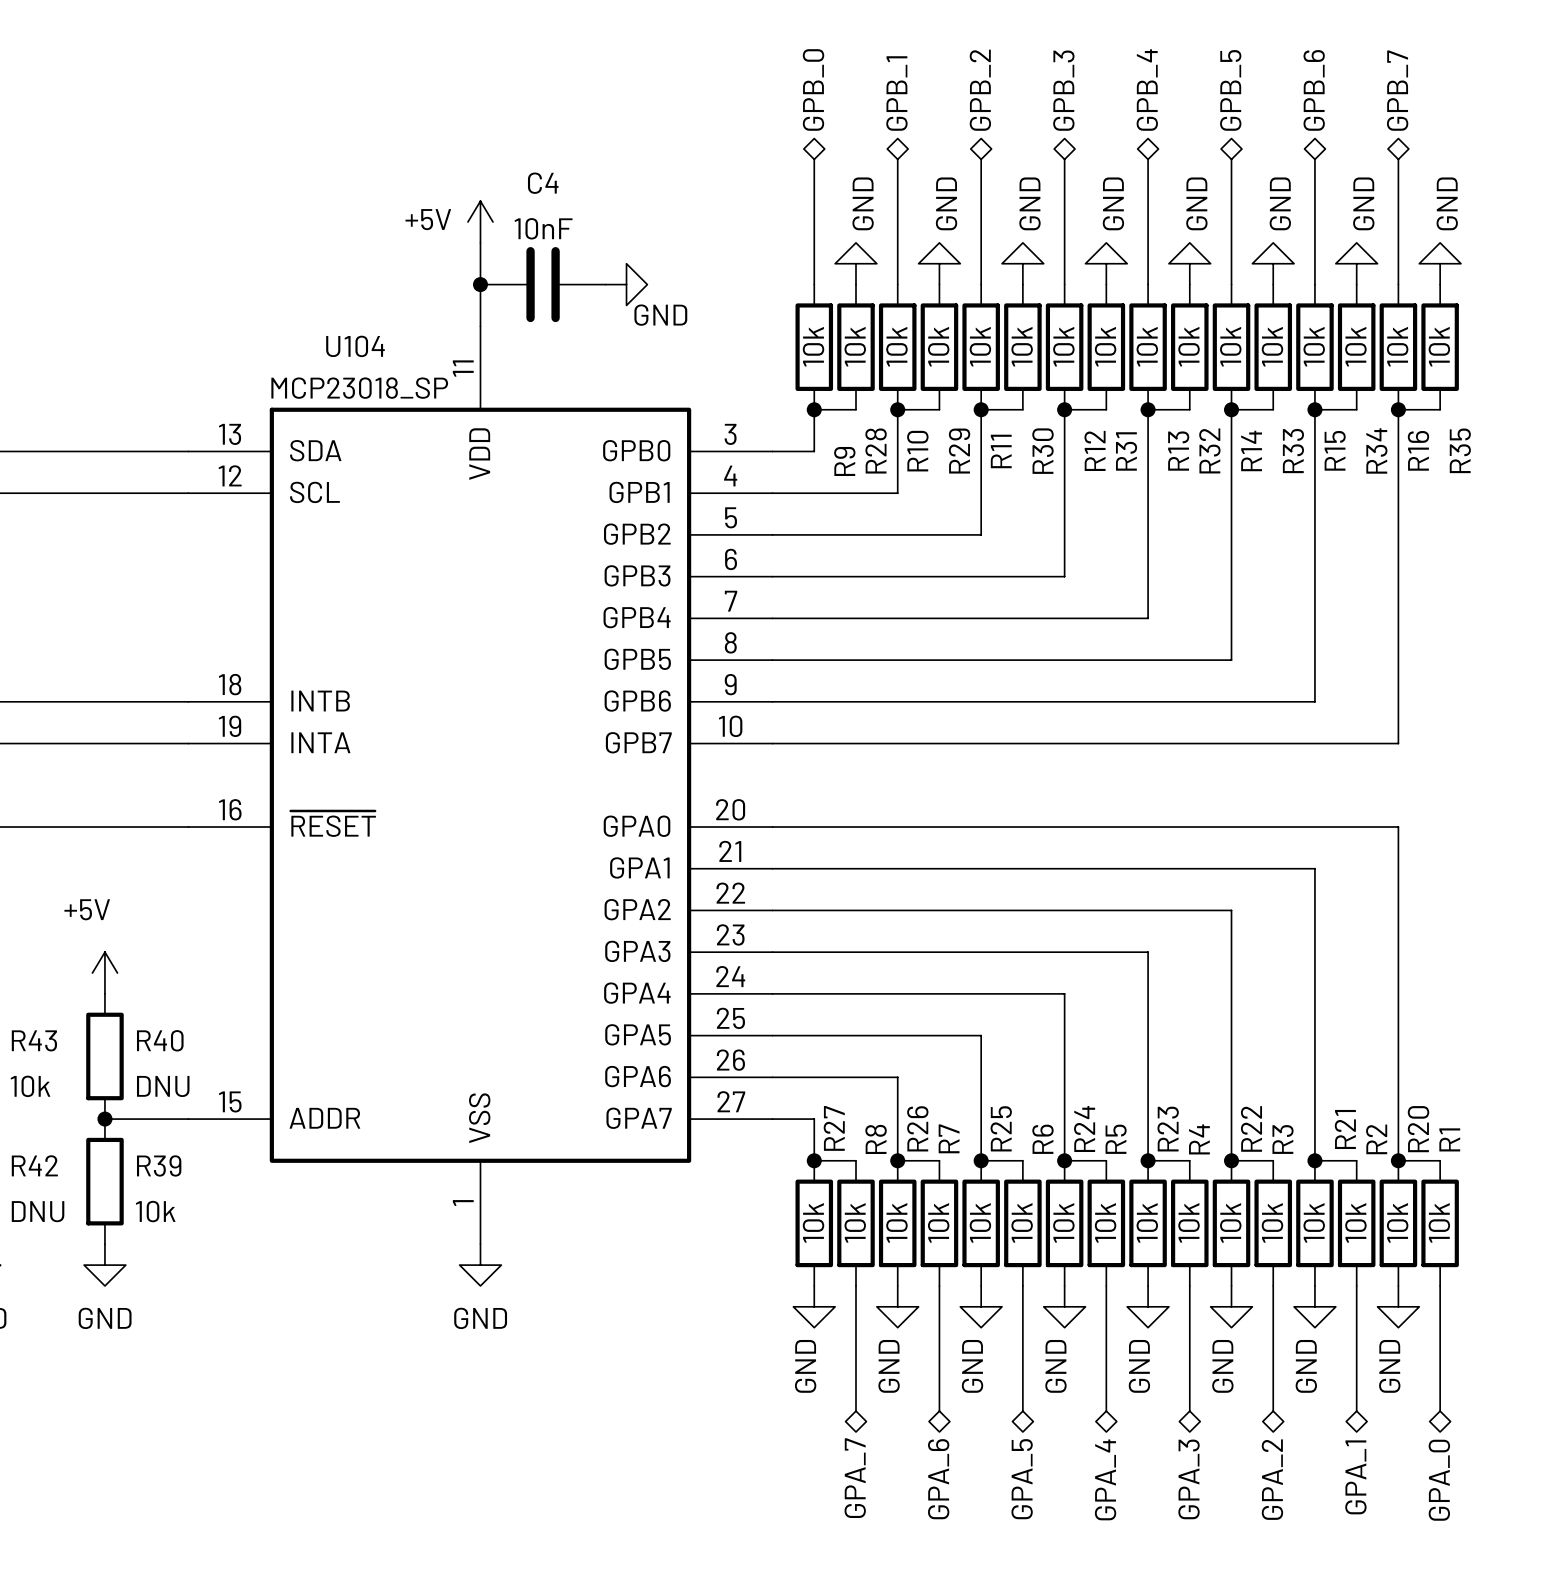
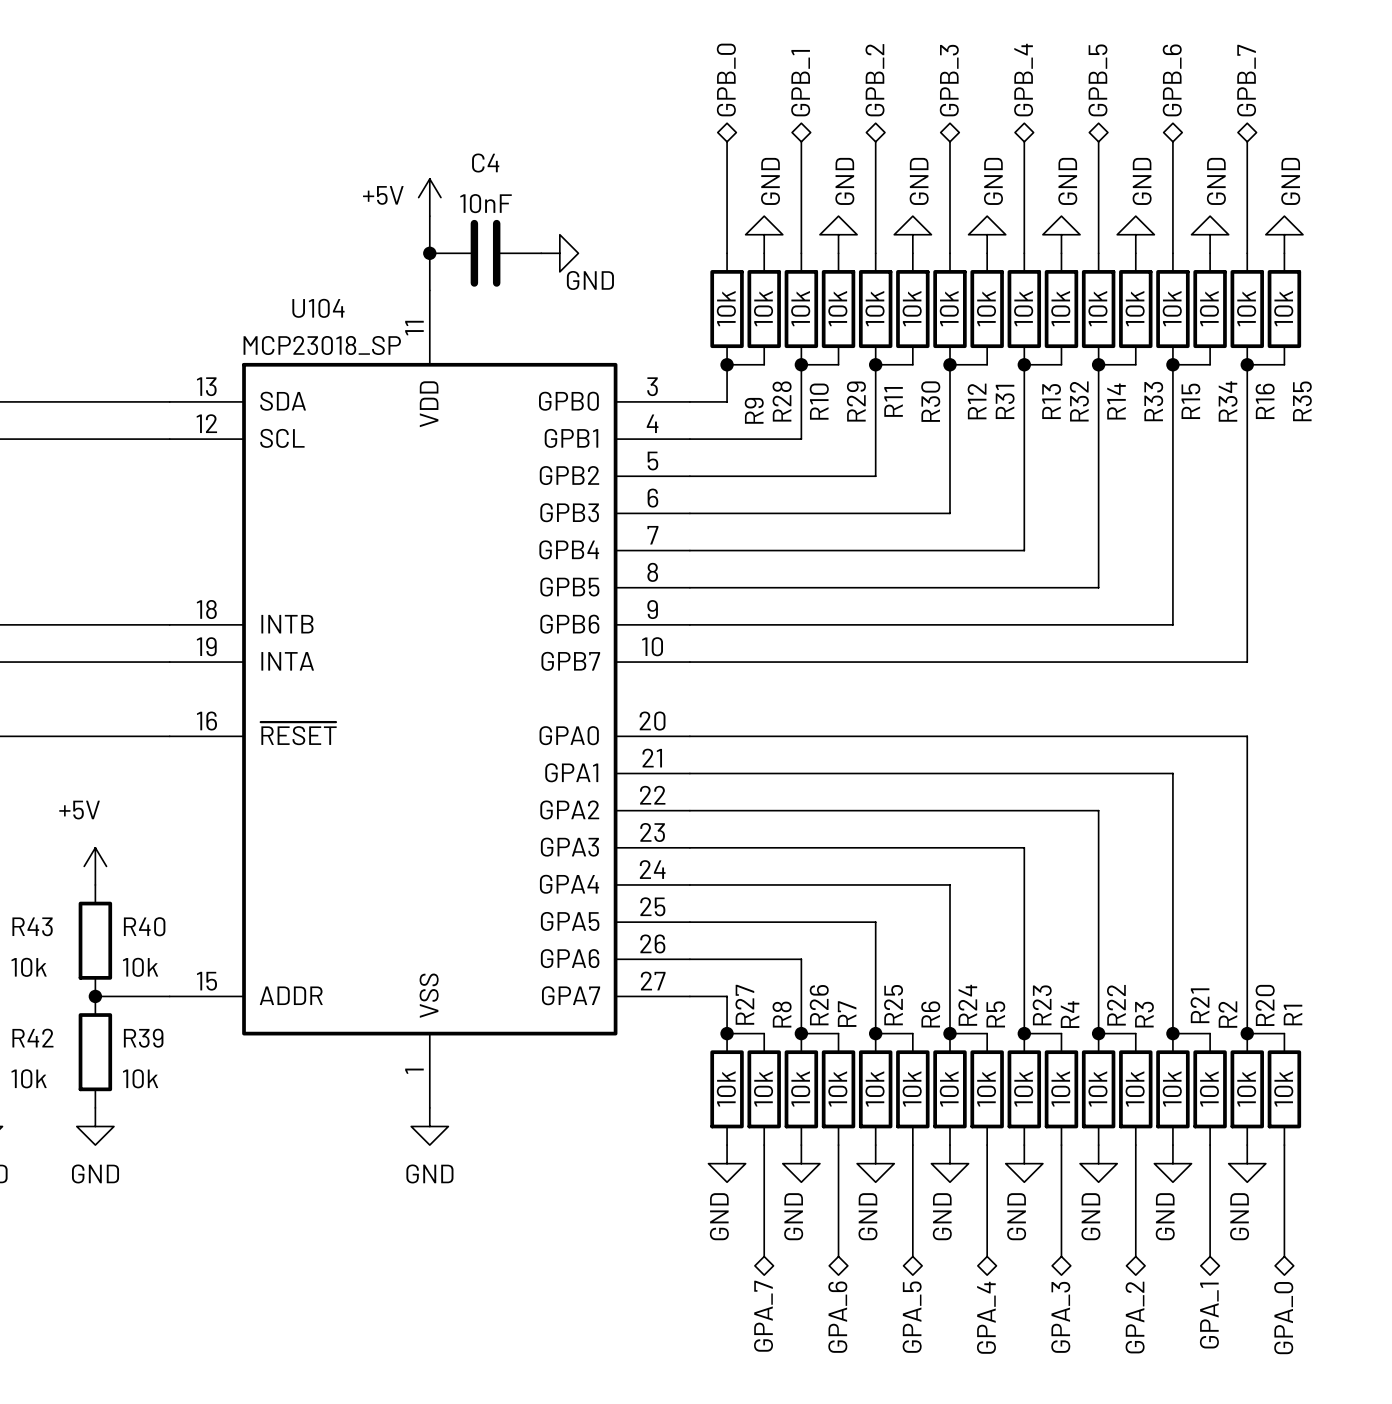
R40 value: DNU (163, 1086) -> 10k (140, 967)
R42 value: DNU (38, 1211) -> 10k (29, 1078)

